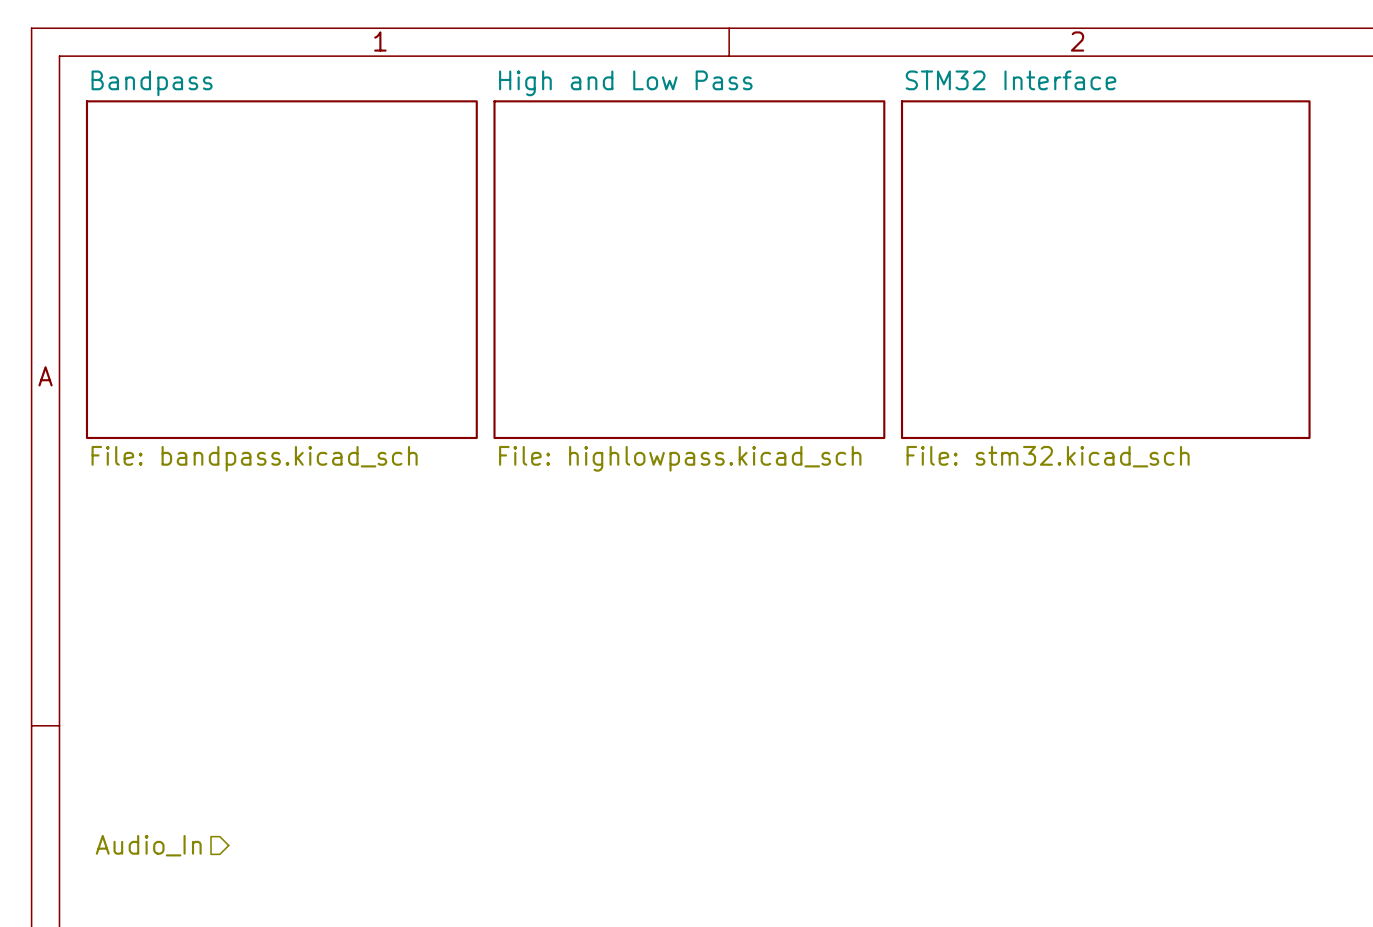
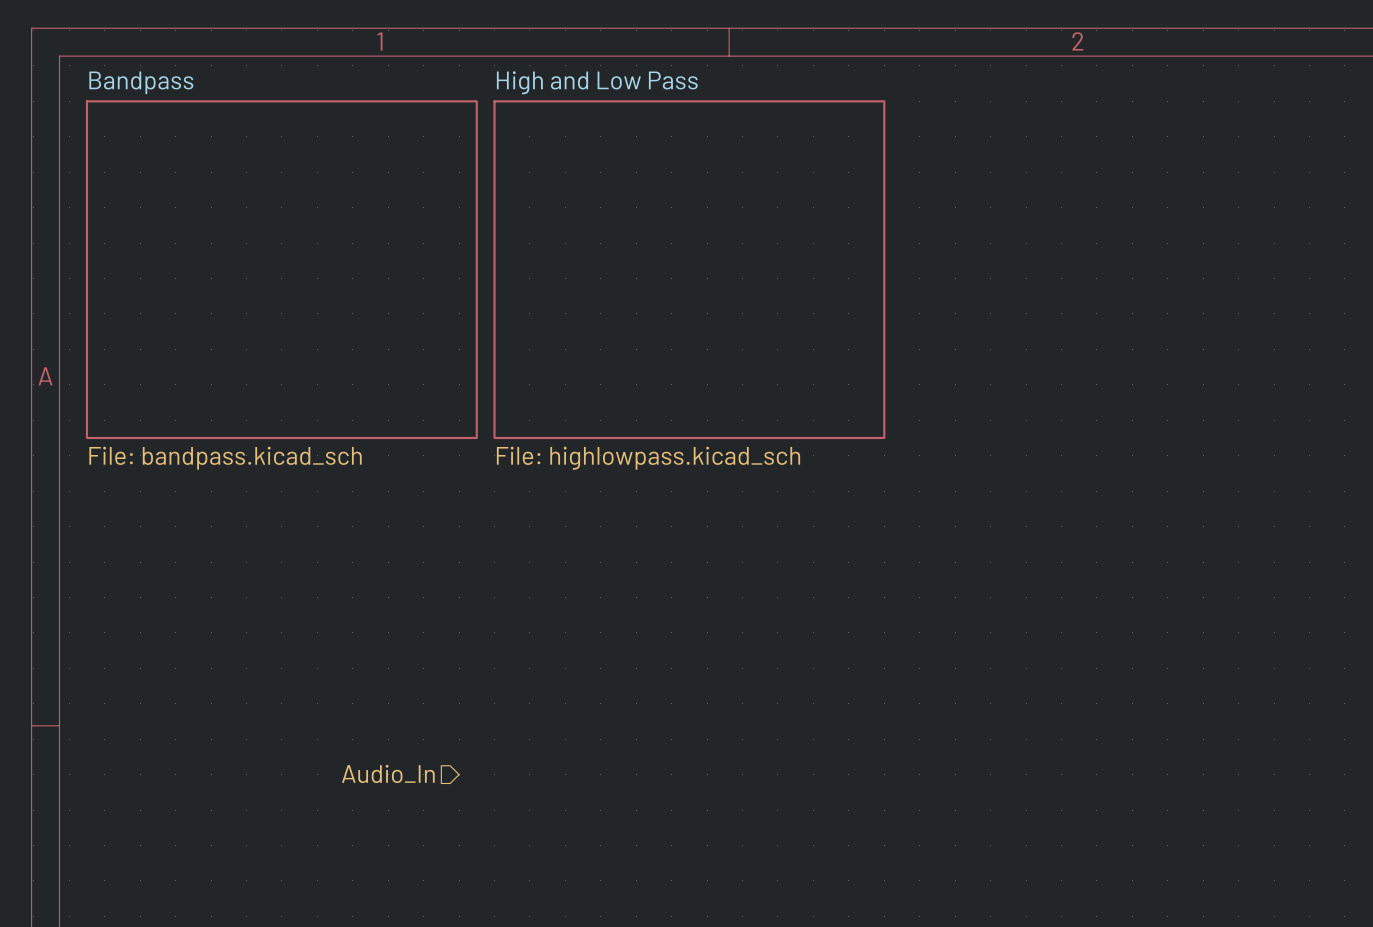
sheet STM32 Interface: File: stm32.kicad_sch (1105, 269) -> none
hierarchical label position: Audio_In (148, 845) -> Audio_In (388, 773)

